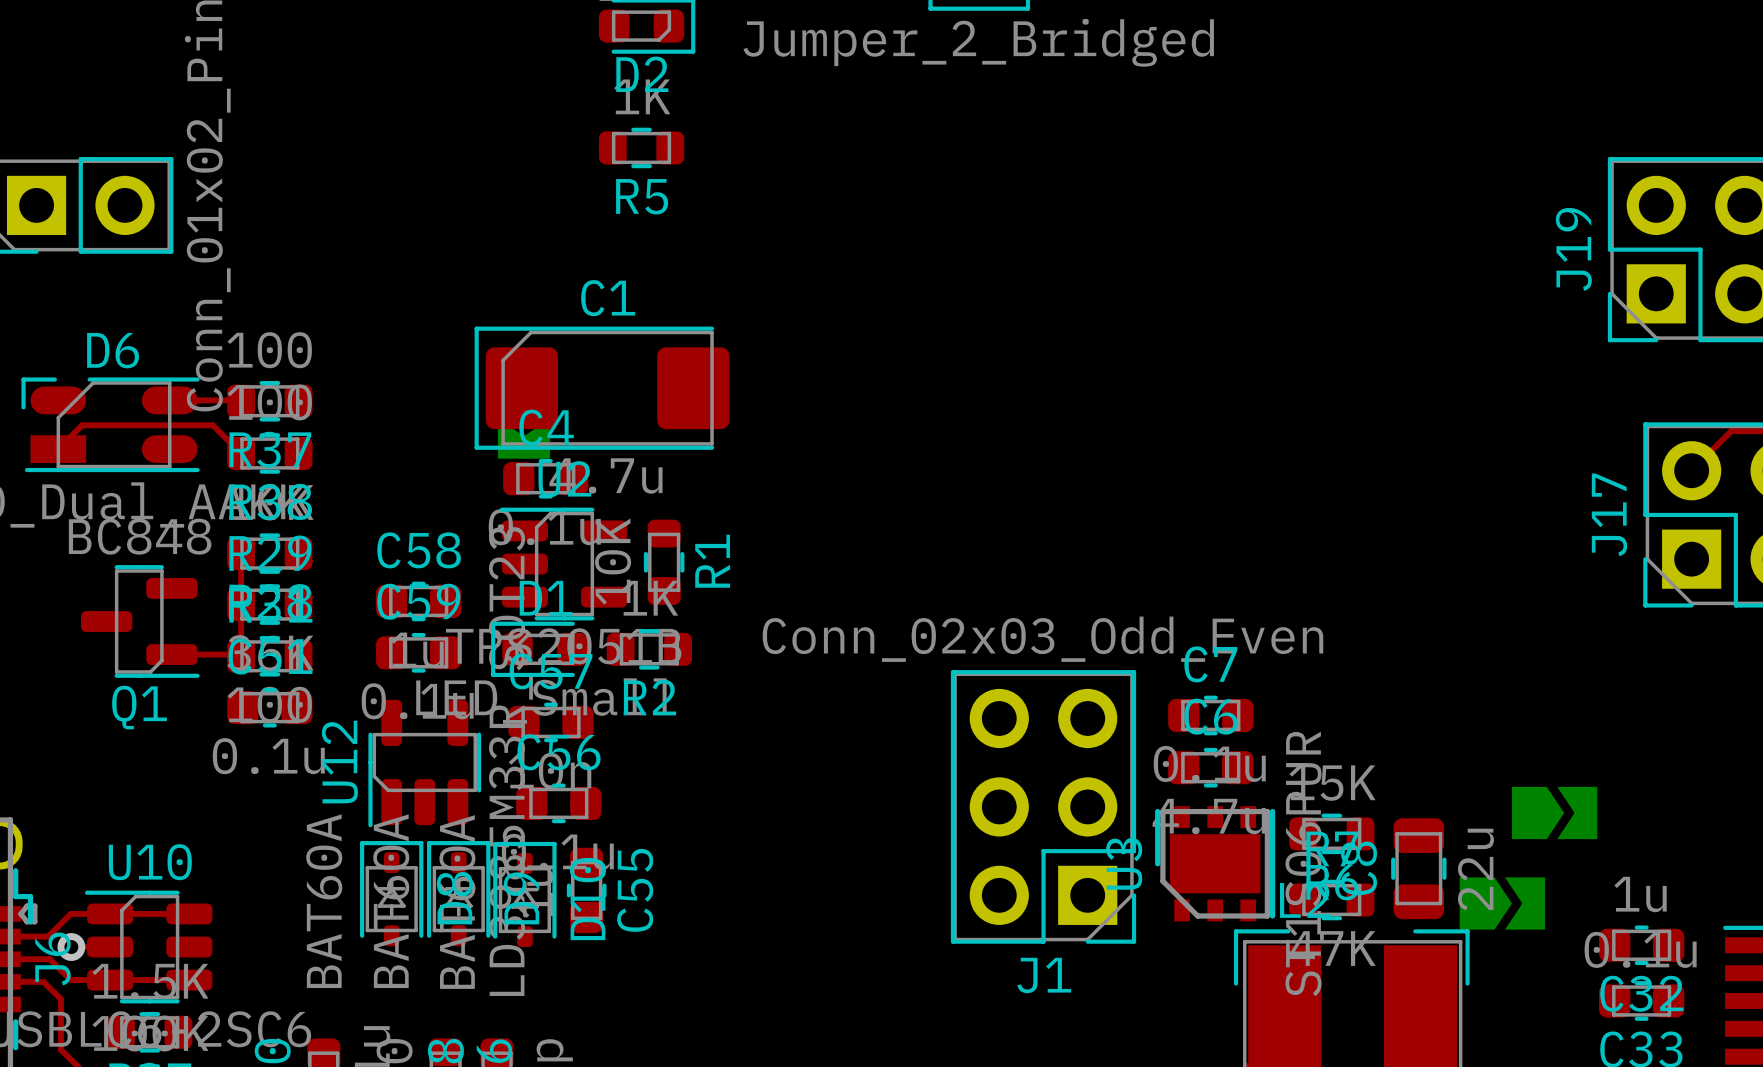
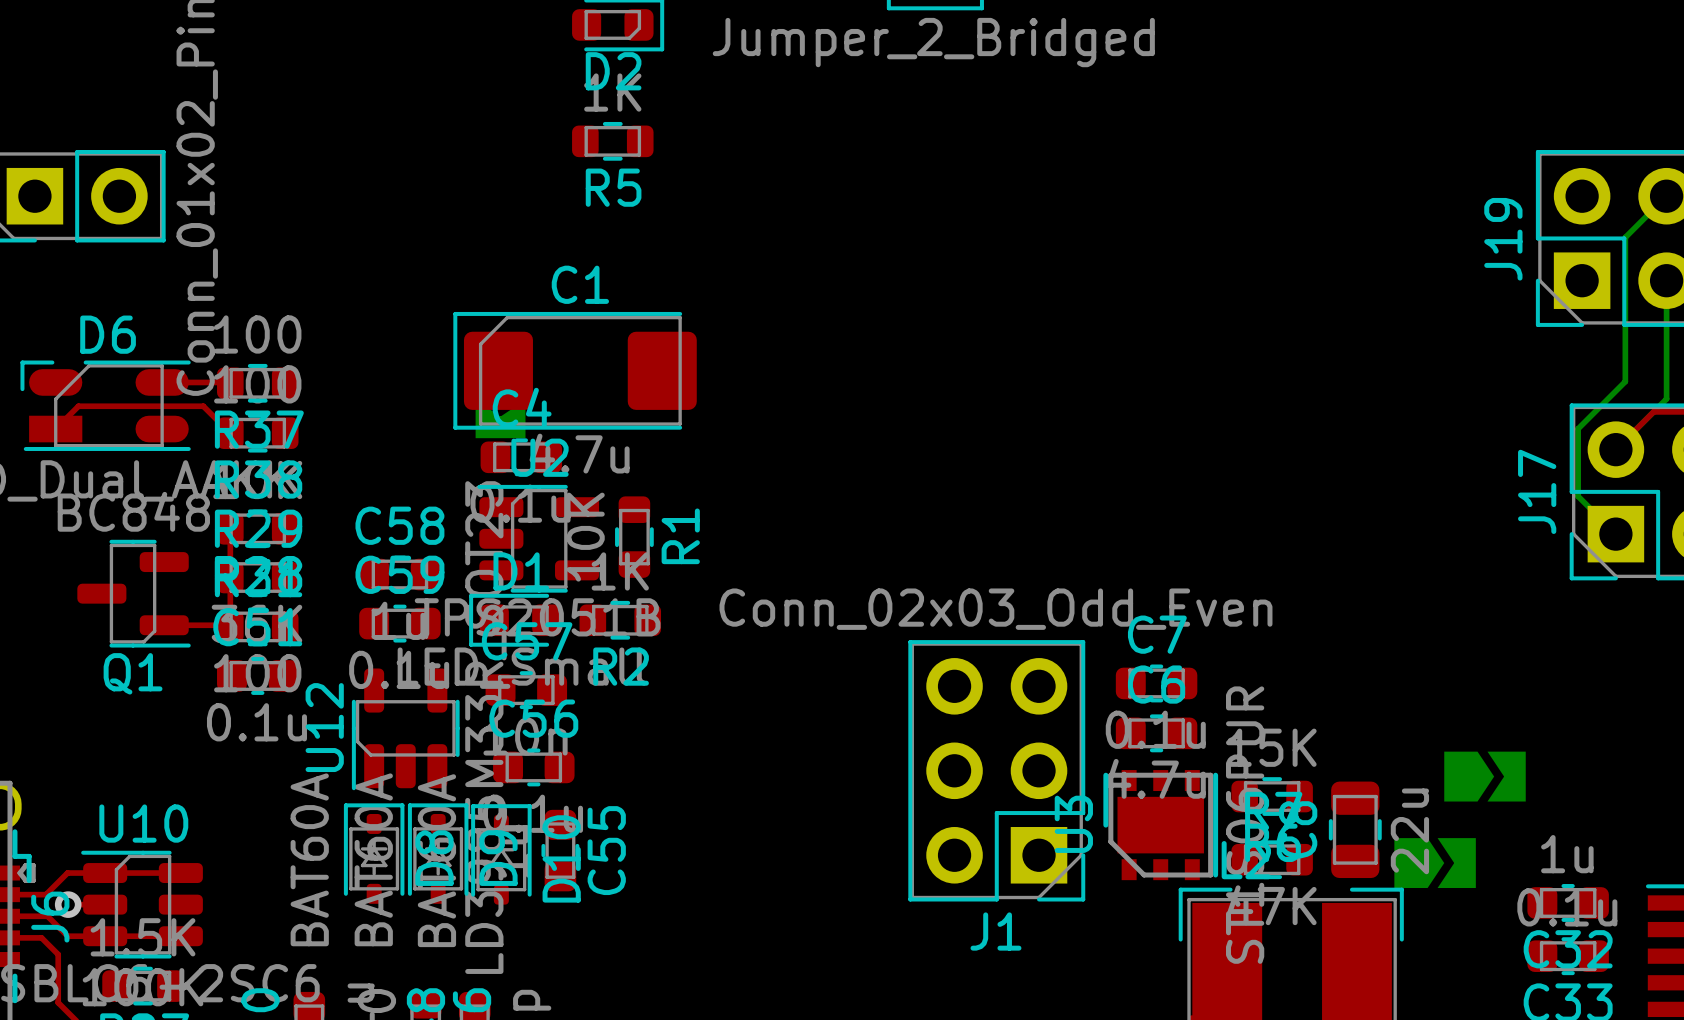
bottom track: none -> (1666, 196) (1625, 237) (1625, 381) (1578, 428) (1578, 496) (1615, 534)
bottom track: none -> (1666, 280) (1666, 398) (1615, 449)

